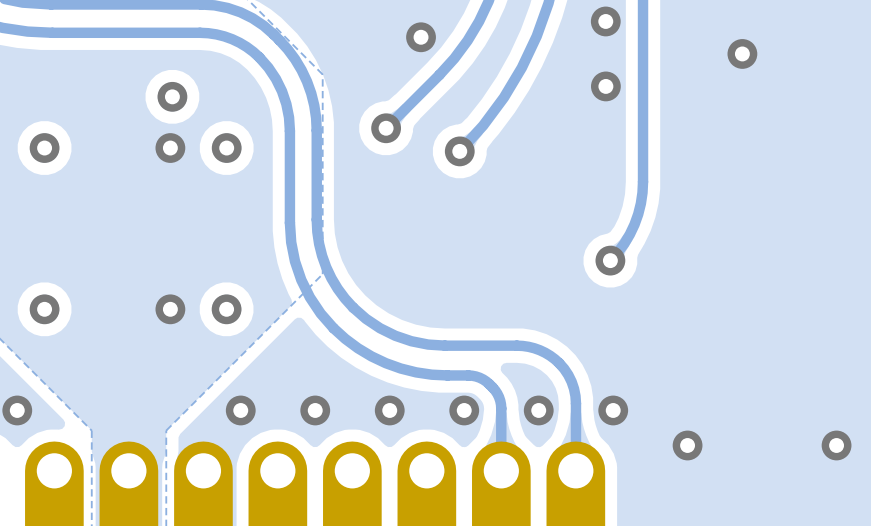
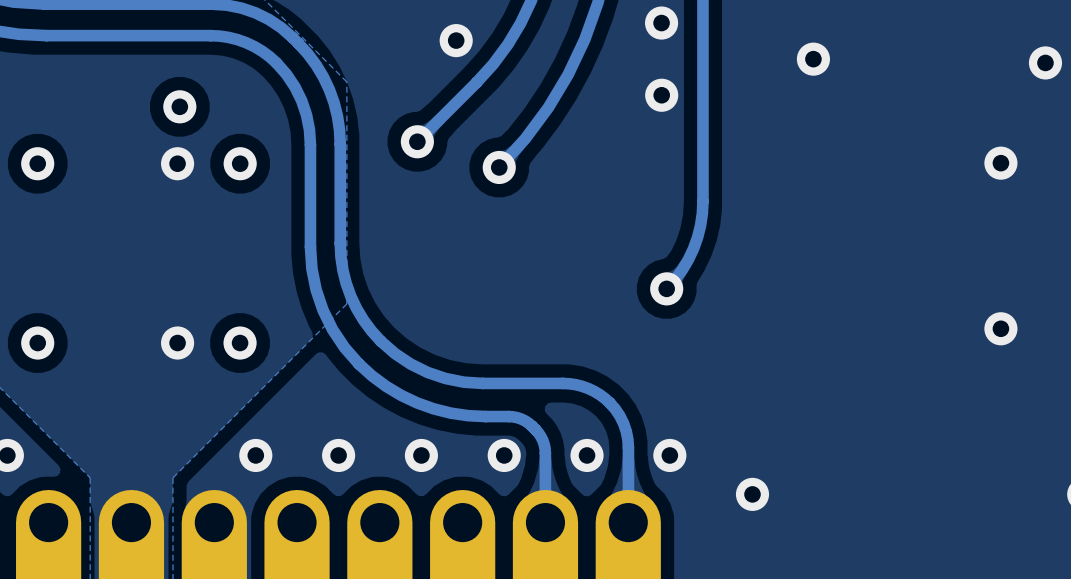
via: (836, 445) -> none

